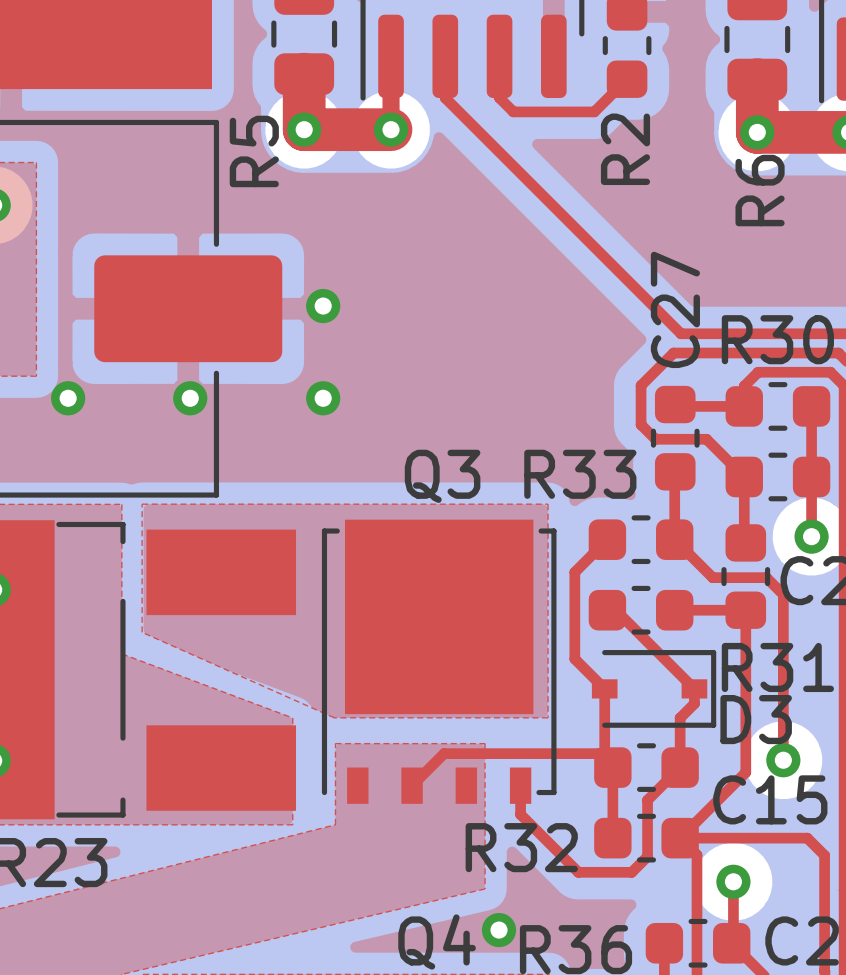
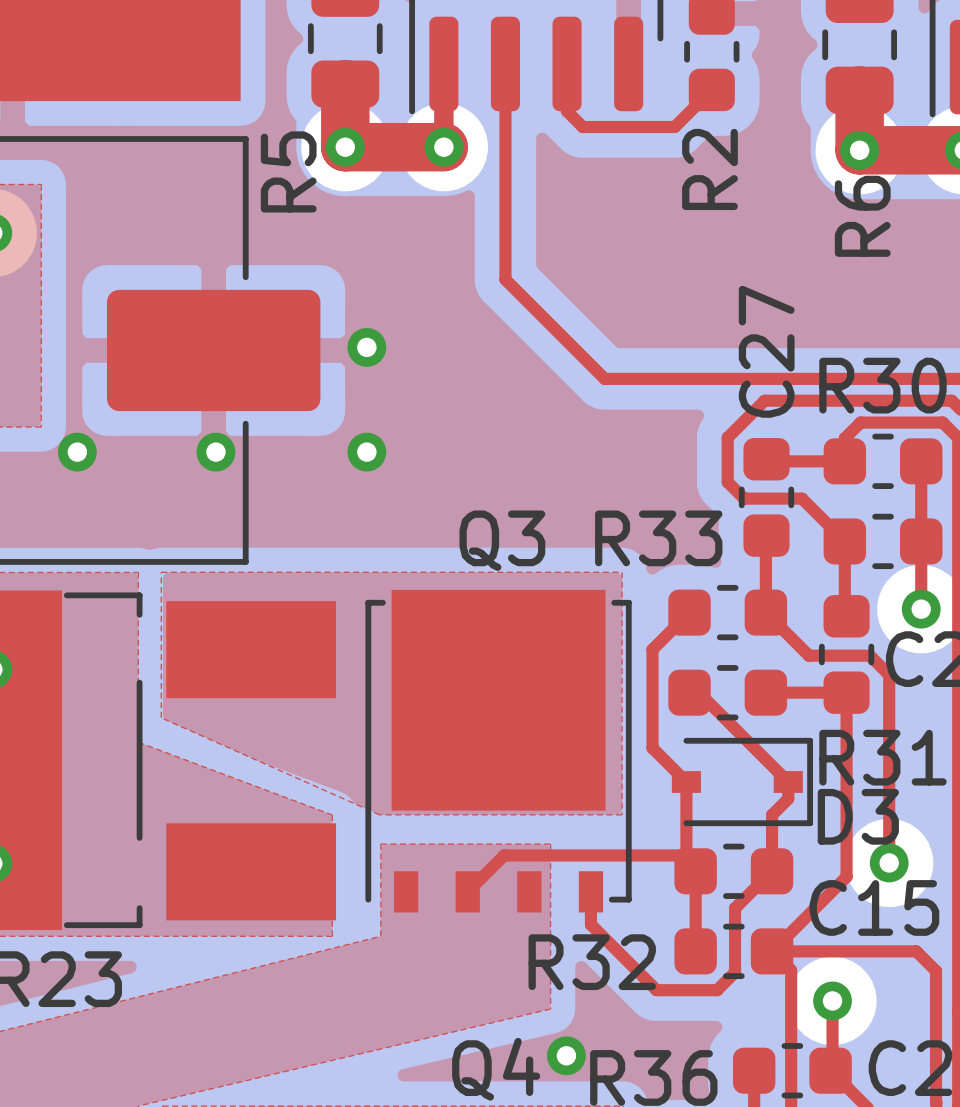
top track: (445, 98) (681, 333) -> (505, 111) (505, 279) (604, 378) (773, 378)

